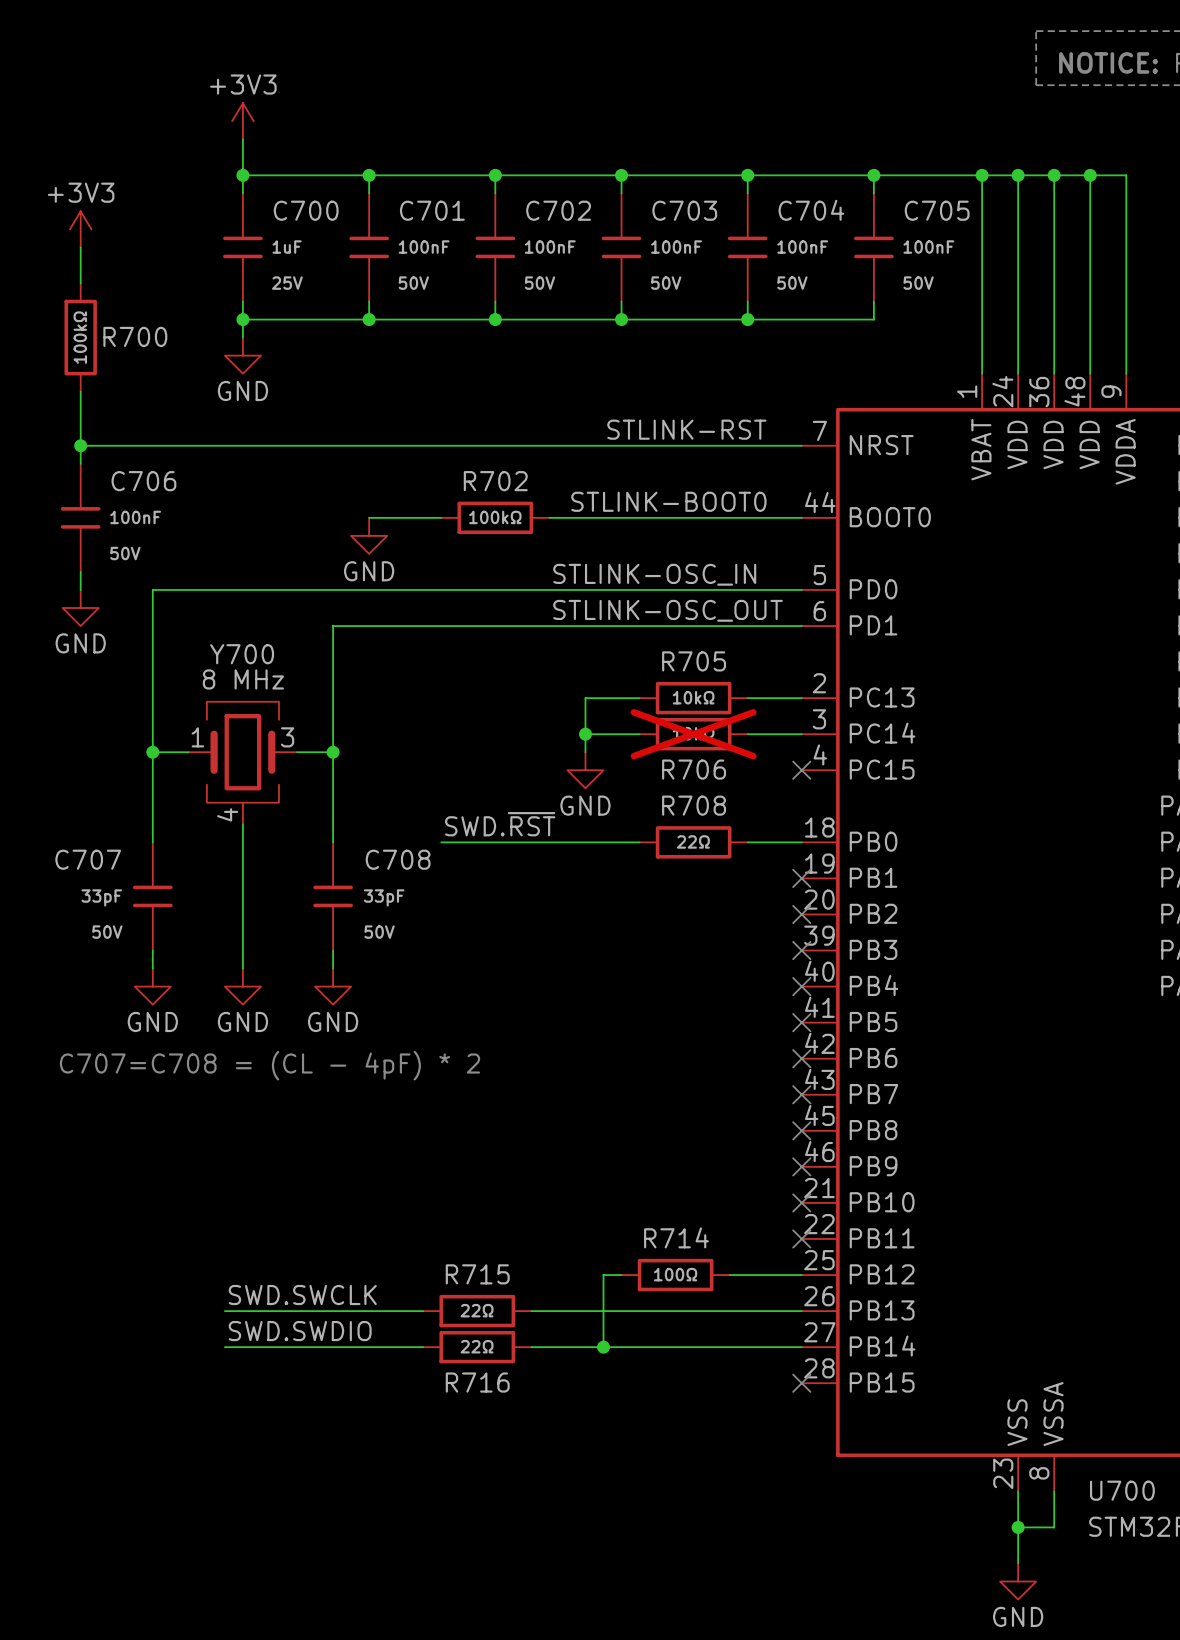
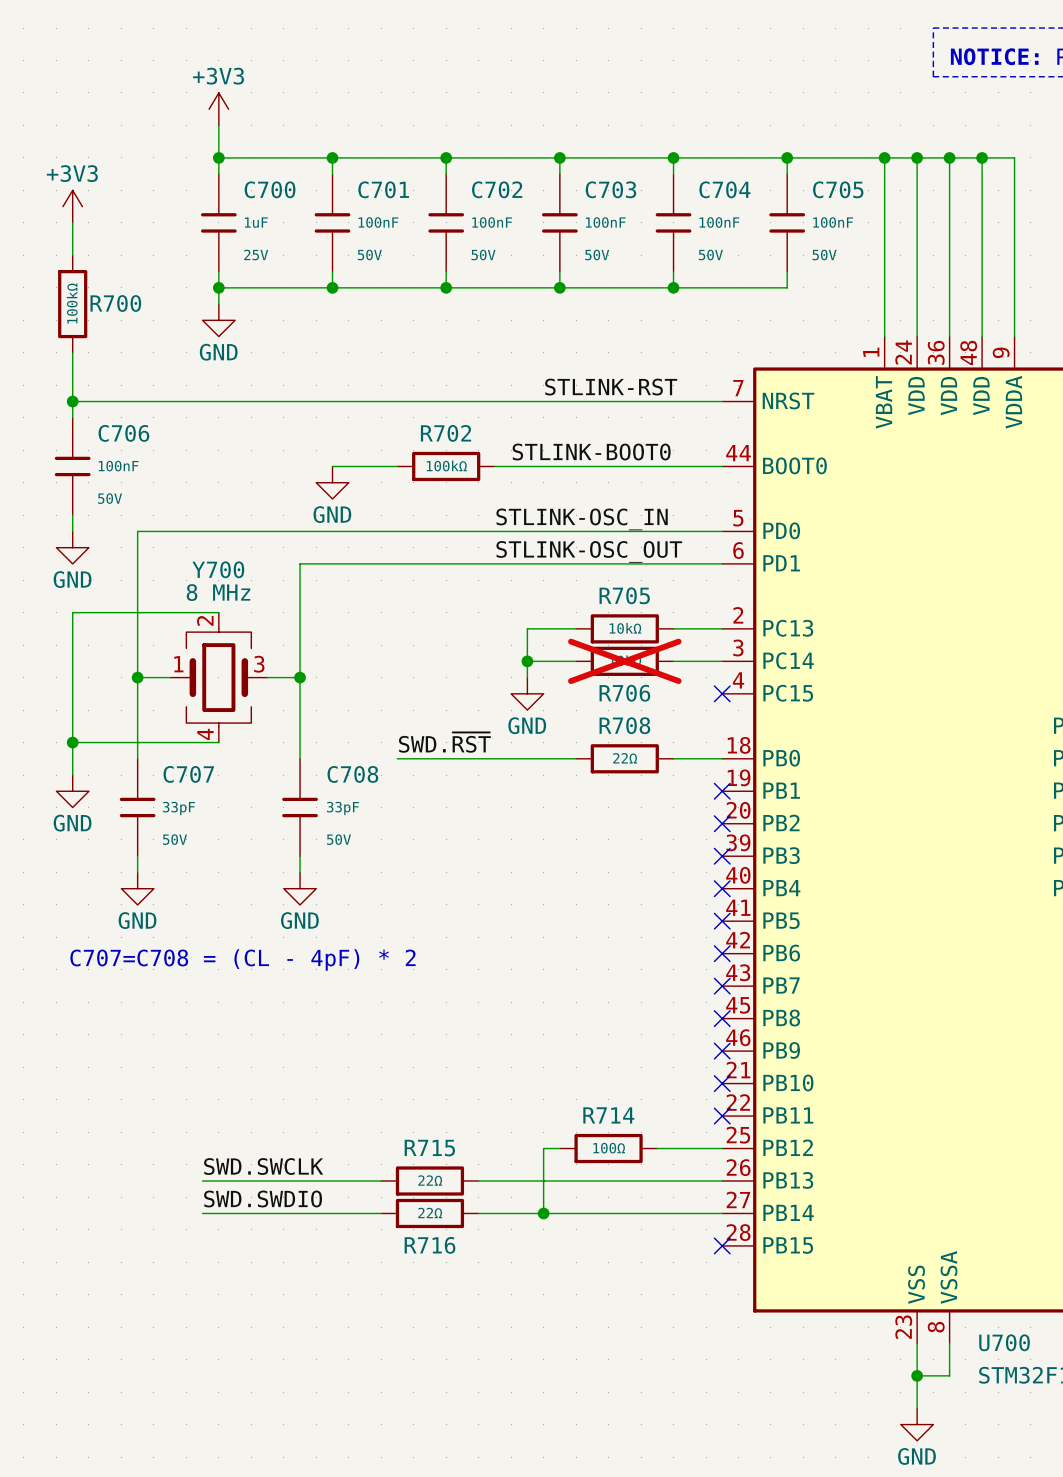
wire: none -> (218, 612) (72, 612) (72, 775)
Y700 symbol: [188, 701, 298, 825] -> [170, 612, 268, 743]
junction: none -> (72, 742)
wire: (242, 824) (242, 968) -> (218, 742) (72, 742)
C707 name position: C707 (88, 859) -> C707 (188, 774)
C707 value position: 33pF (101, 897) -> 33pF (178, 808)
C707 text position: 50V (107, 932) -> 50V (174, 839)
power symbol position: GND (242, 986) -> GND (72, 791)

